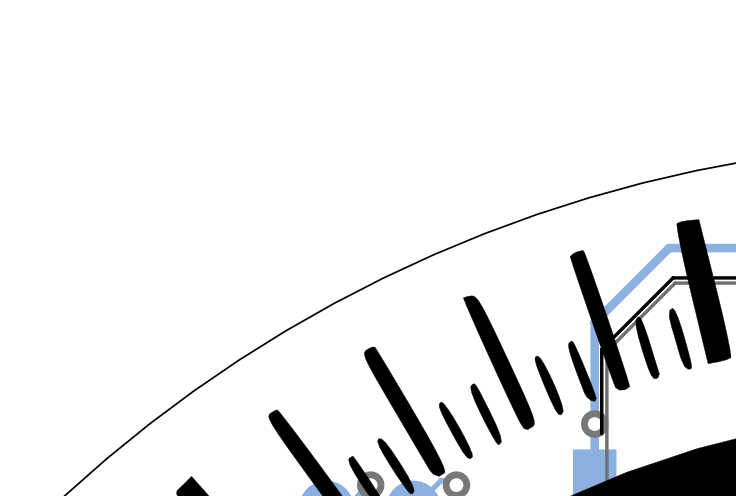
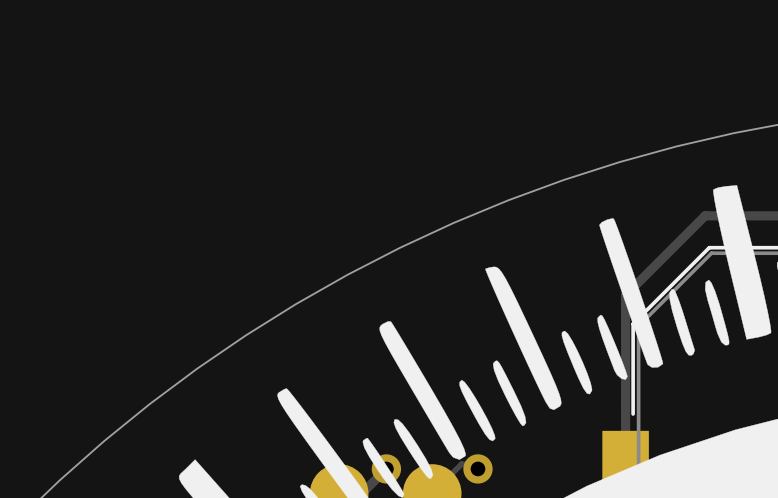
via: (594, 424) -> none

